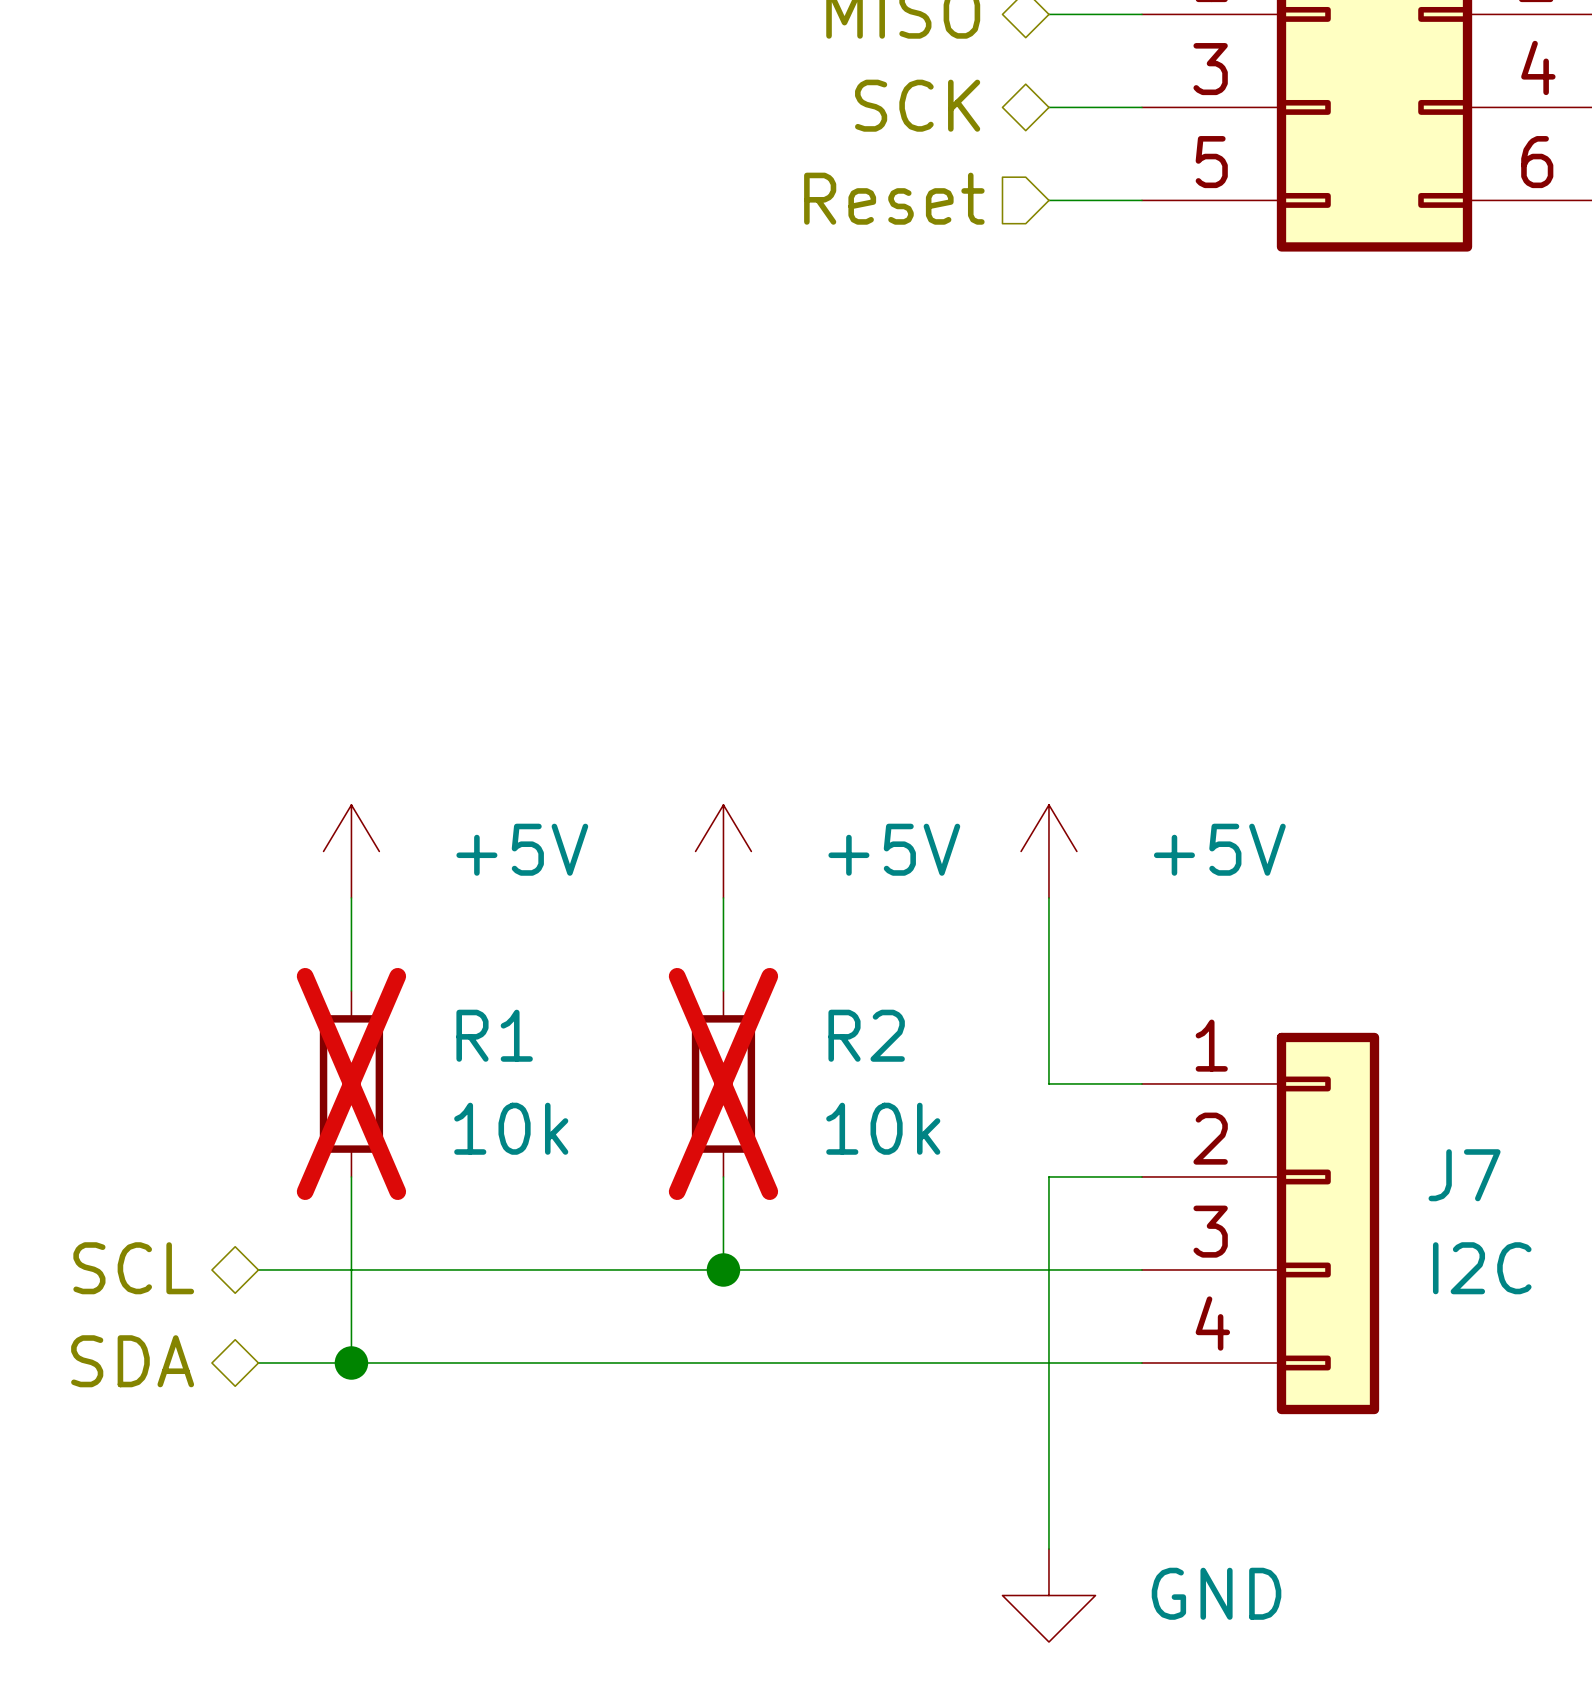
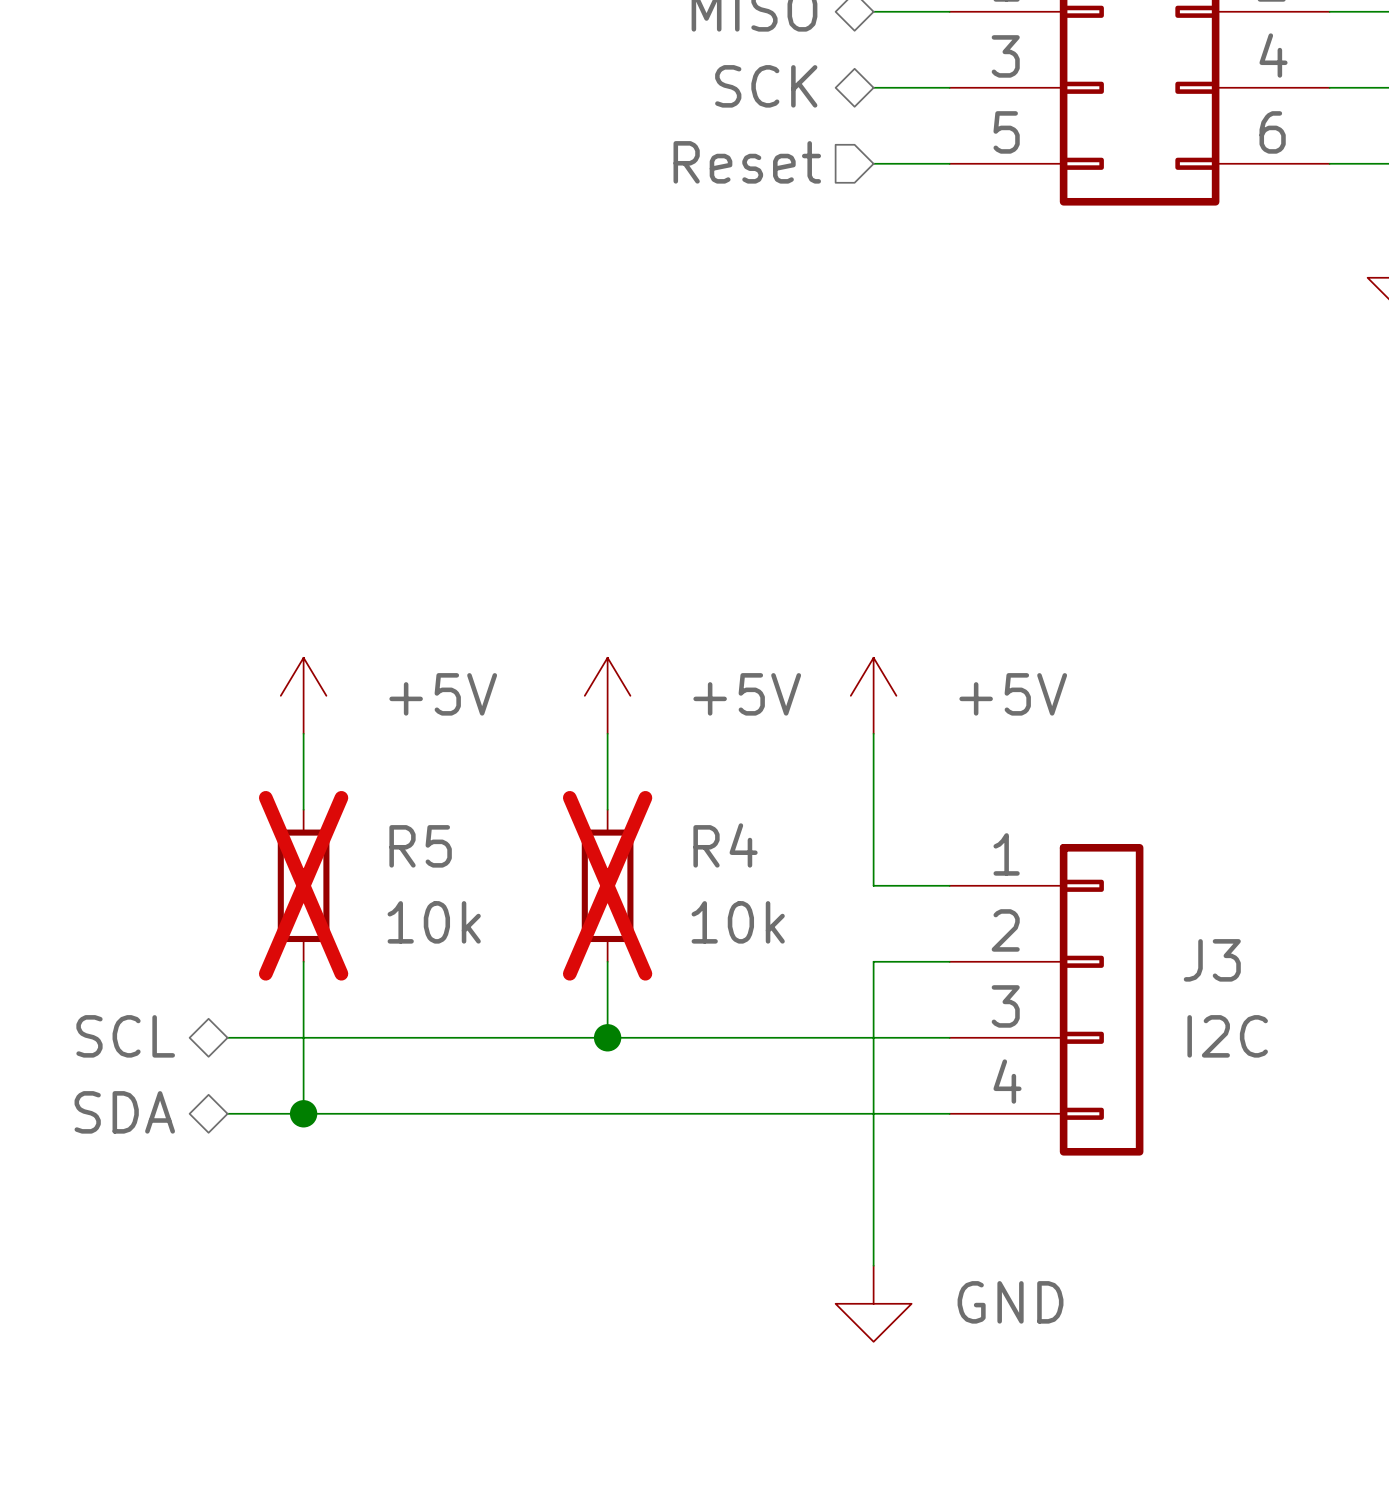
R1 name: R1 (494, 1035) -> R5 (420, 846)
R2 name: R2 (866, 1035) -> R4 (725, 845)
J7 name: J7 (1464, 1175) -> J3 (1212, 960)

